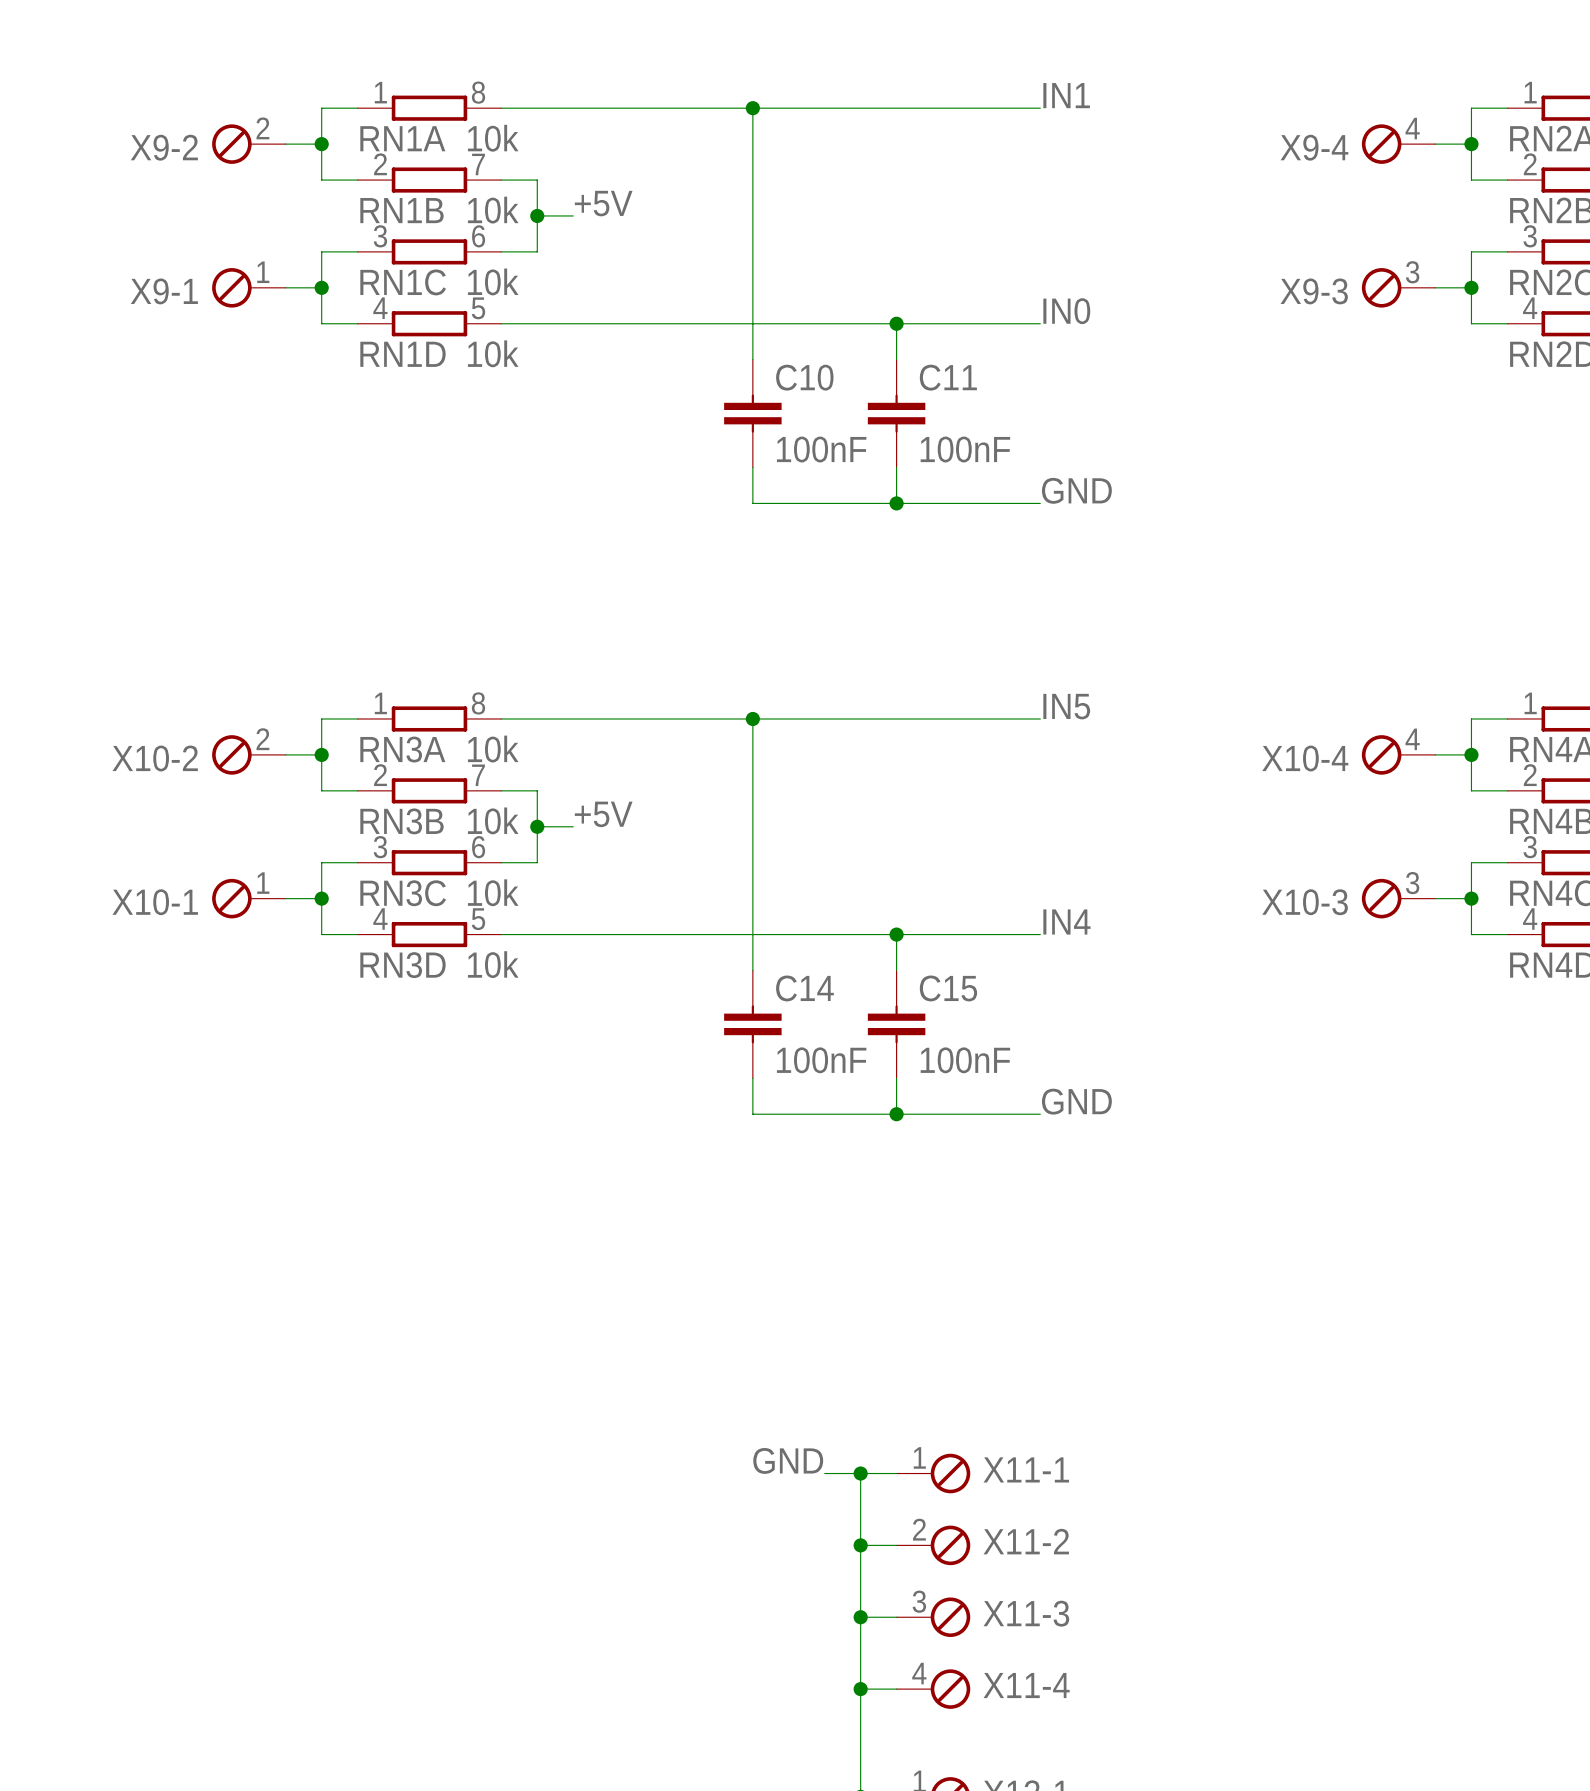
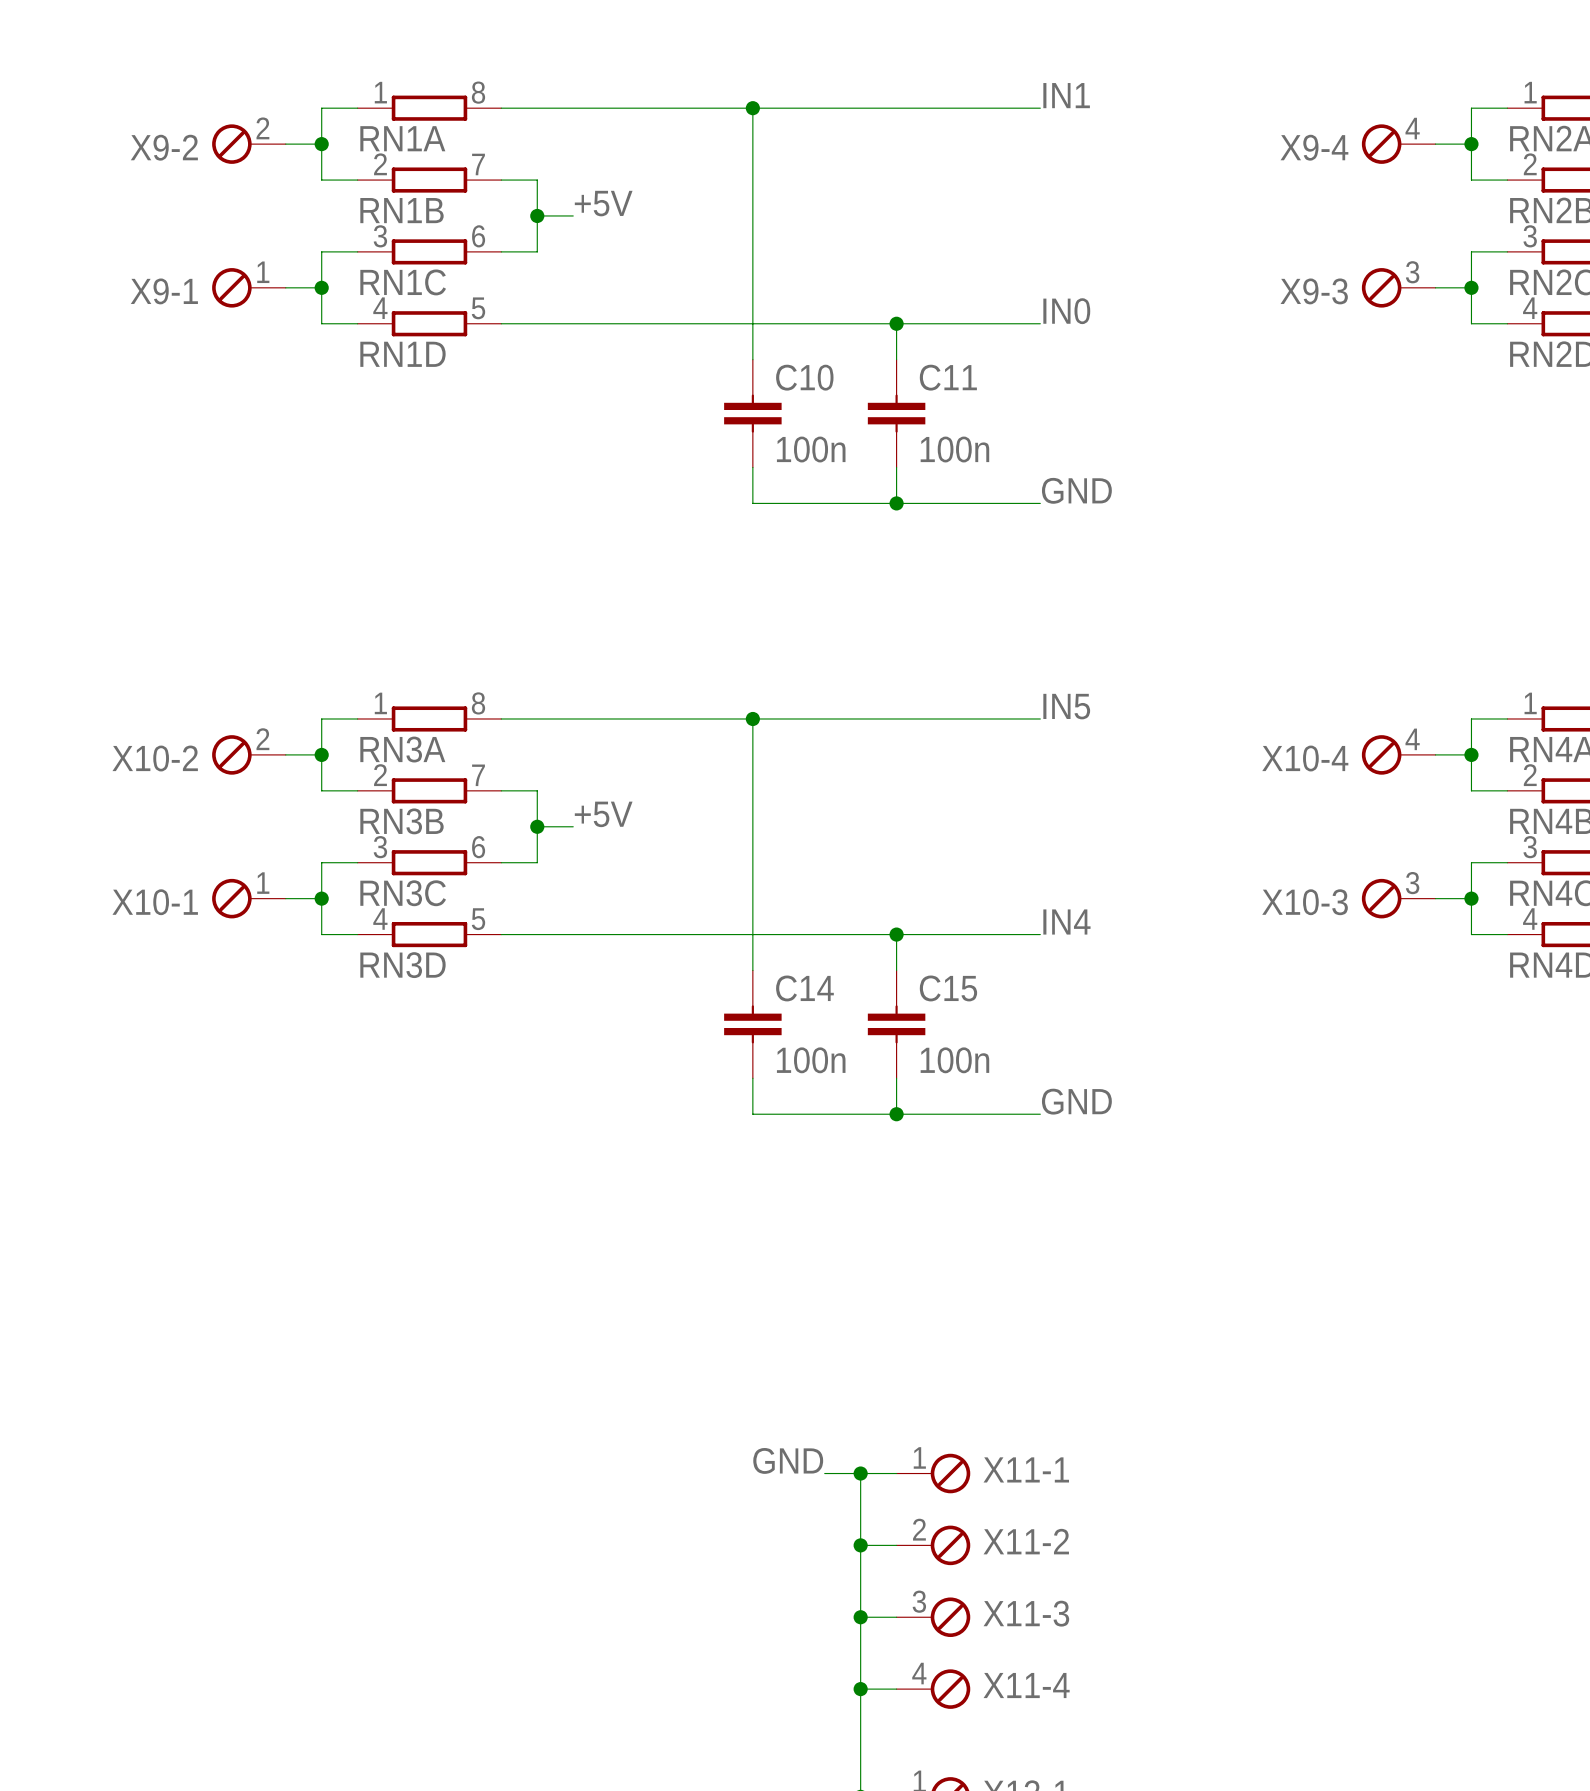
RN1A value: 10k (493, 138) -> none
RN1B value: 10k (493, 210) -> none
RN1C value: 10k (493, 281) -> none
RN1D value: 10k (493, 353) -> none
C10 value: 100nF (821, 449) -> 100n (811, 449)
C11 value: 100nF (965, 449) -> 100n (954, 449)
RN3A value: 10k (493, 749) -> none
RN3B value: 10k (493, 820) -> none
RN3C value: 10k (493, 892) -> none
RN3D value: 10k (493, 964) -> none
C14 value: 100nF (821, 1060) -> 100n (811, 1060)
C15 value: 100nF (965, 1060) -> 100n (954, 1060)

